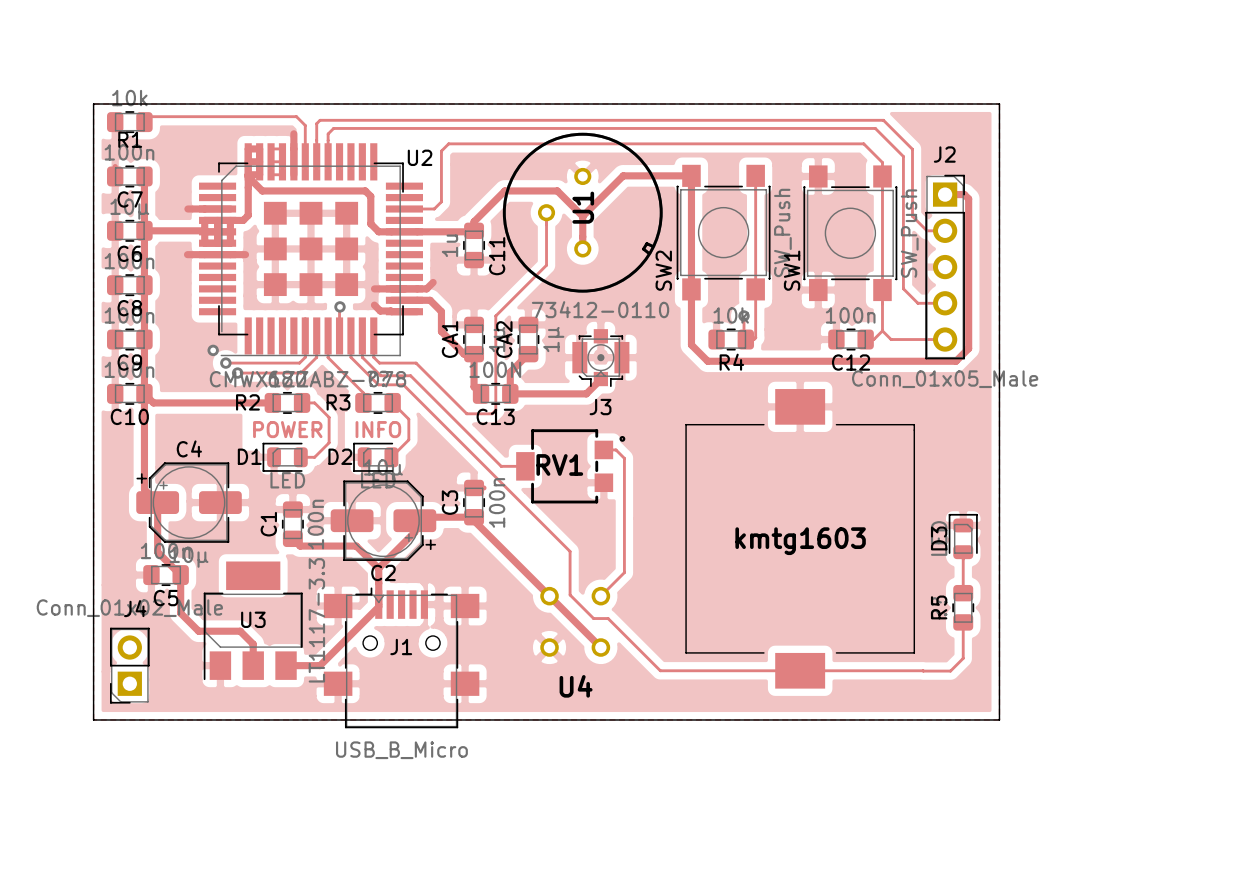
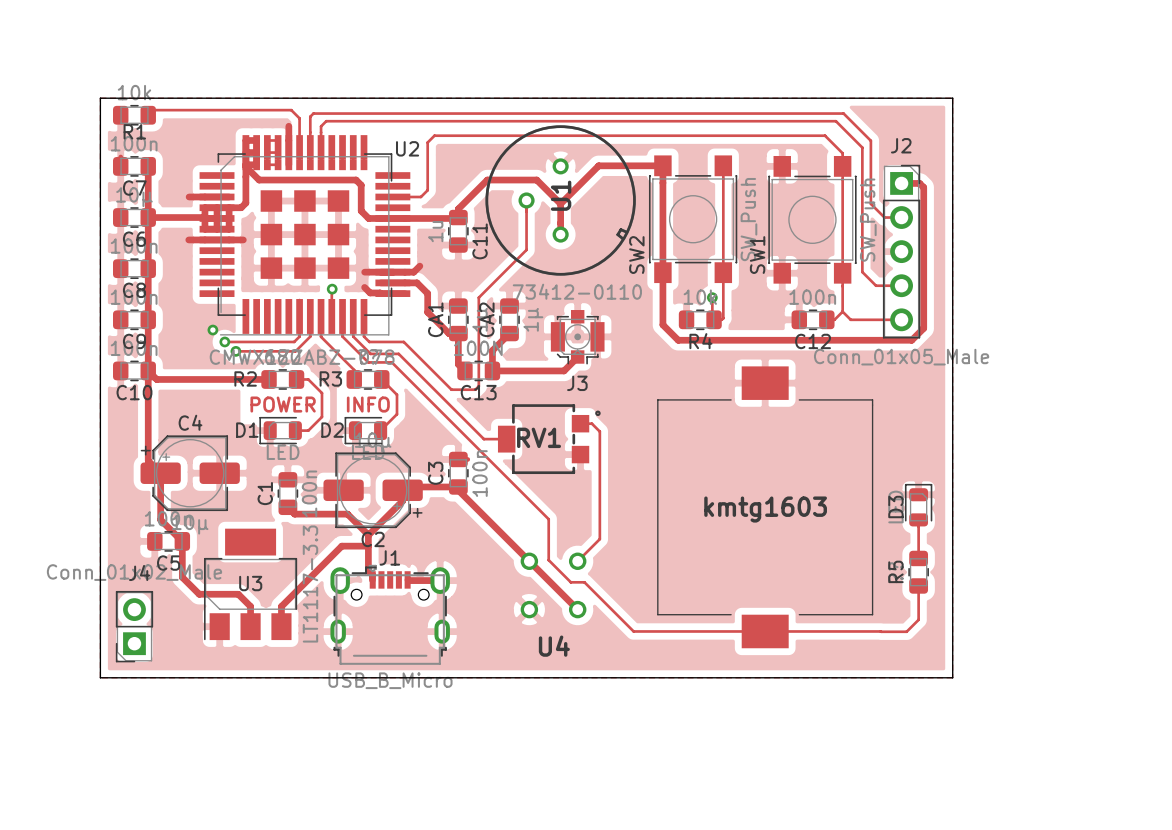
track: (378, 568) (378, 606) (320, 665) (286, 665) -> (368, 546) (341, 546) (281, 606) (281, 626)
track: none -> (368, 534) (368, 570) (372, 574) (372, 579)
J1 footprint: [323, 587, 480, 729] -> [330, 564, 450, 665]
track: none -> (407, 579) (440, 580)
J1 name position: J1 (401, 646) -> J1 (389, 557)

